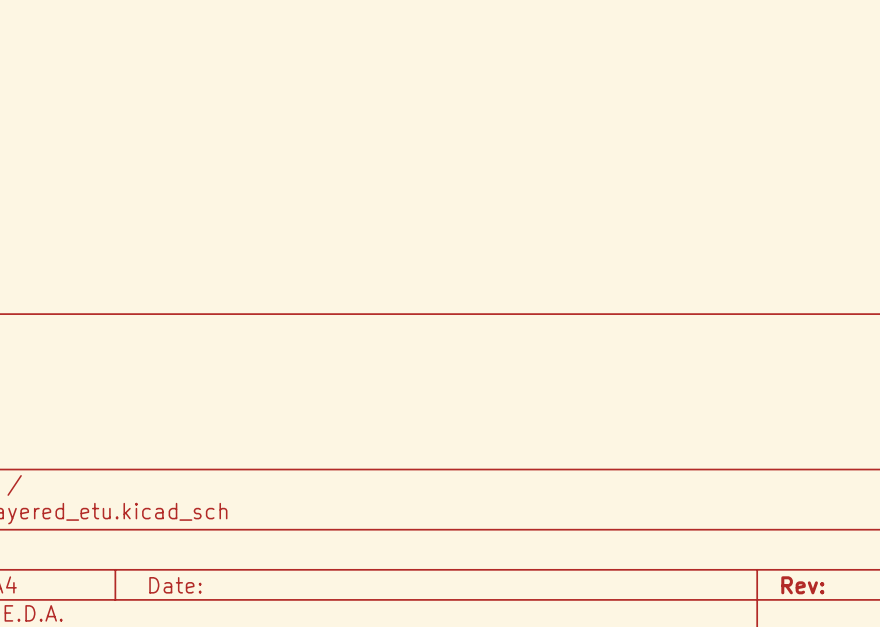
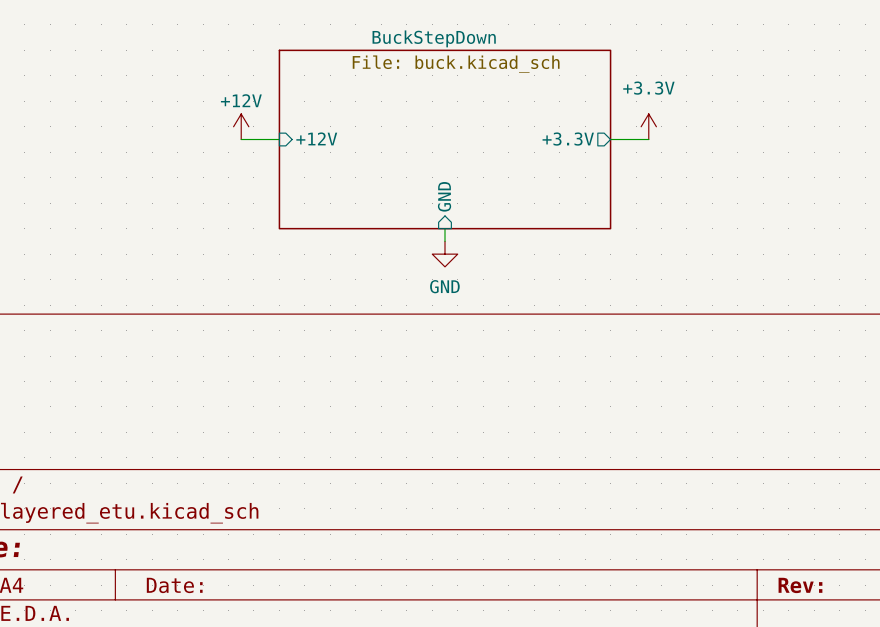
power symbol: none -> +12V (241, 126)
power symbol: none -> +3.3V (648, 126)
wire: none -> (241, 139) (279, 139)
sheet pin: none -> +12V (316, 138)
sheet BuckStepDown: none -> File: buck.kicad_sch (444, 139)
sheet pin: none -> +3.3V (568, 139)
wire: none -> (610, 139) (648, 139)
sheet pin: none -> GND (444, 196)
wire: none -> (444, 228) (444, 241)
power symbol: none -> GND (444, 254)

